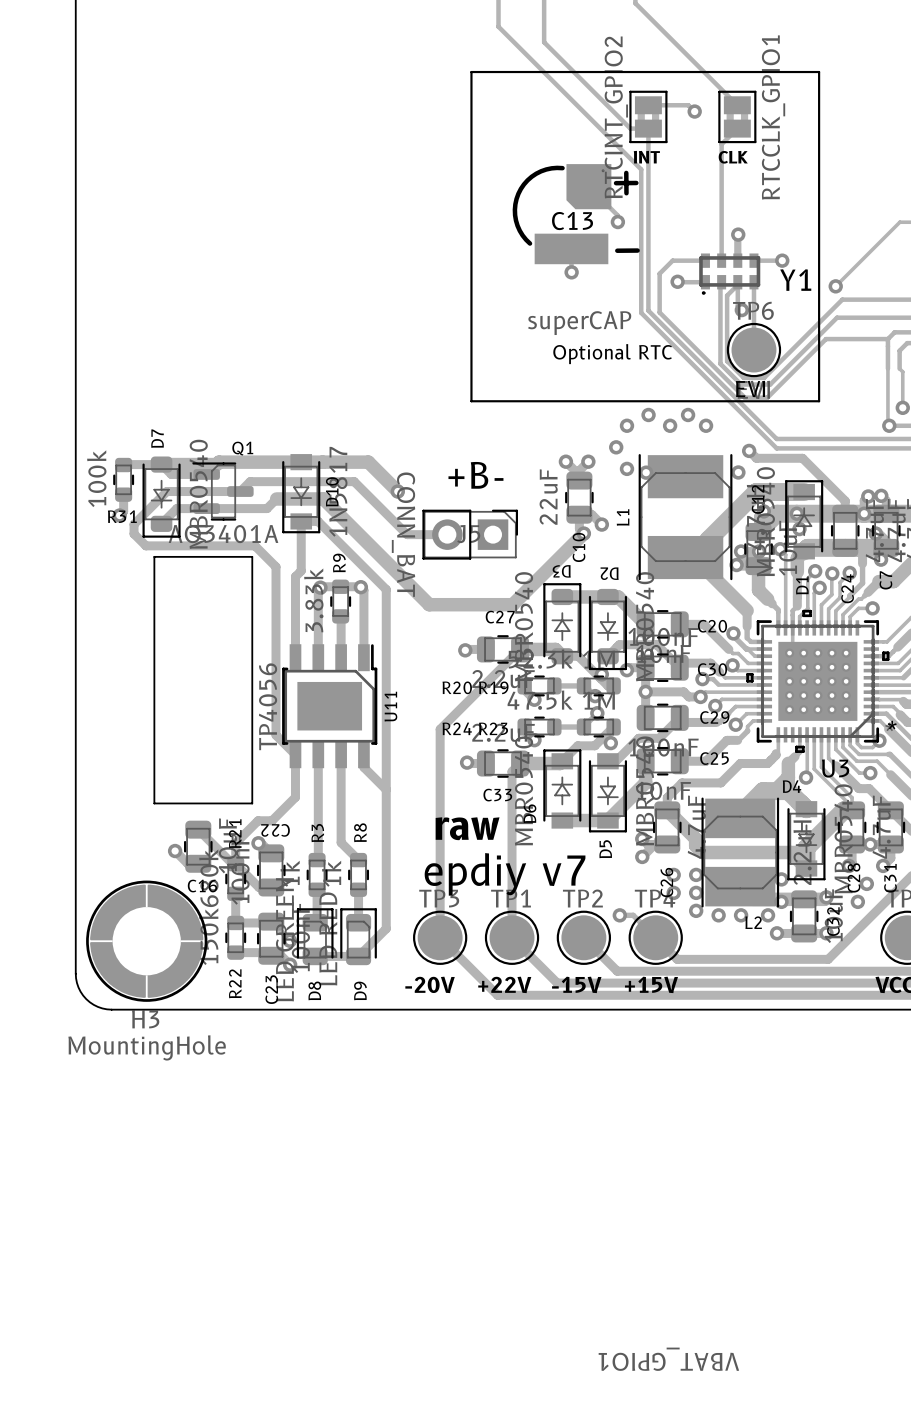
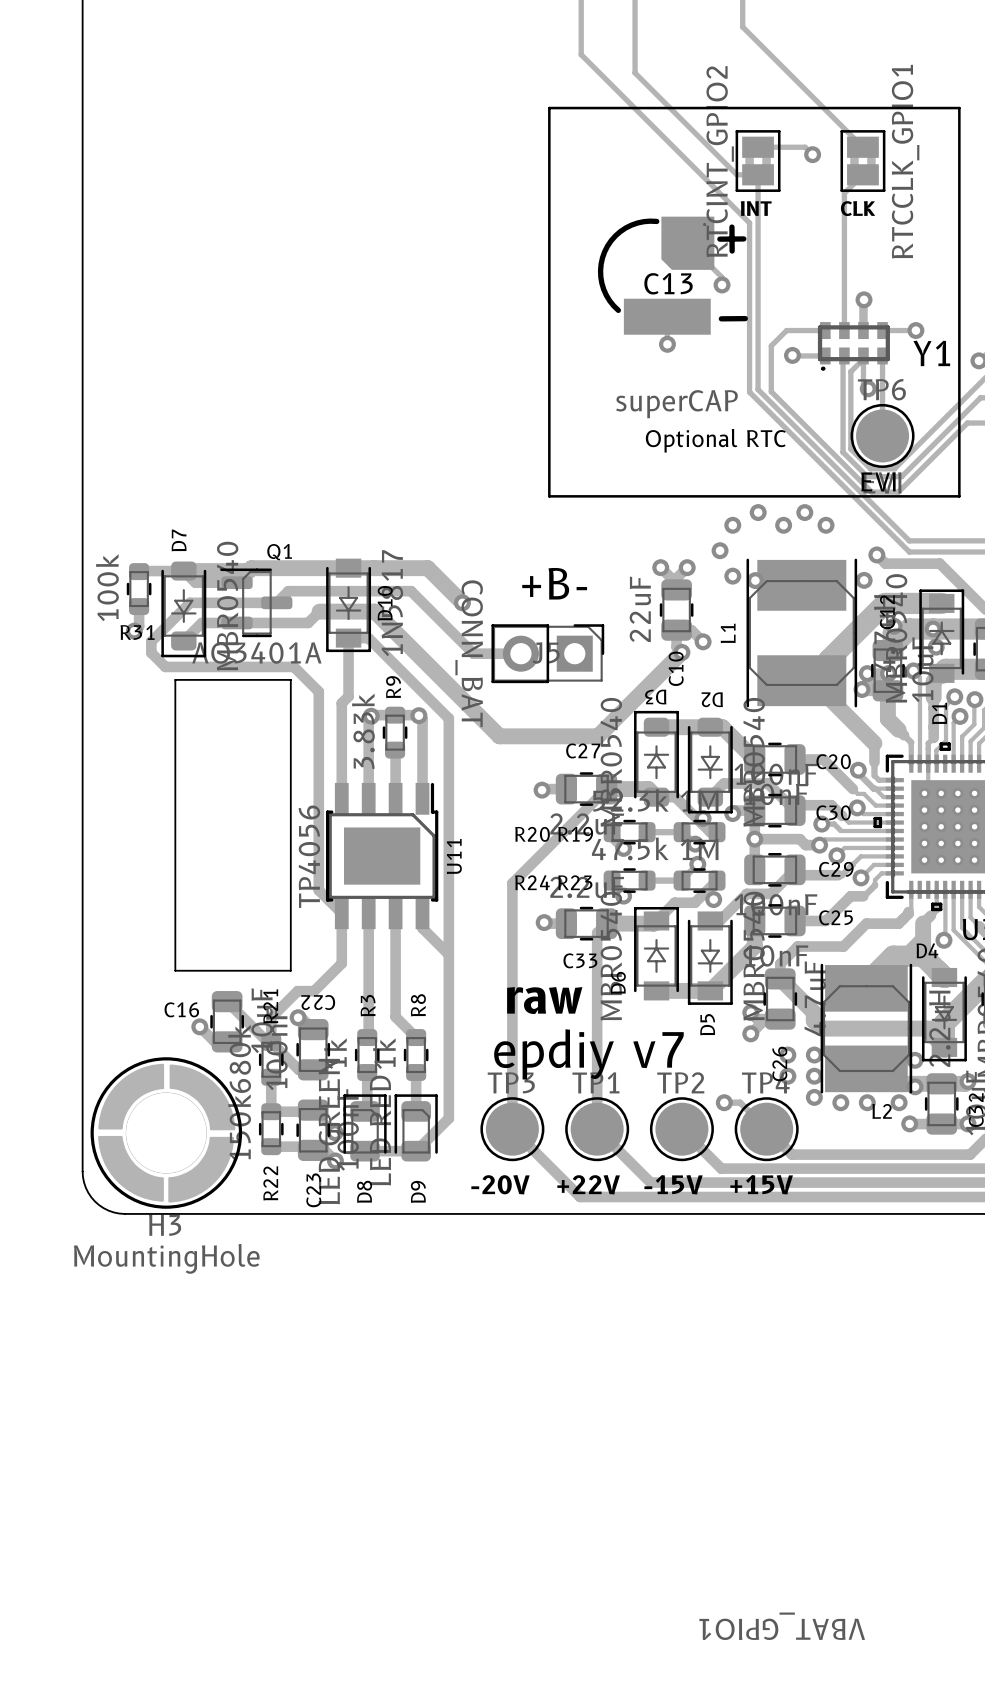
H3 footprint: [86, 880, 208, 1002] -> [90, 1057, 243, 1209]
C16 name position: C16 (202, 886) -> C16 (181, 1009)

